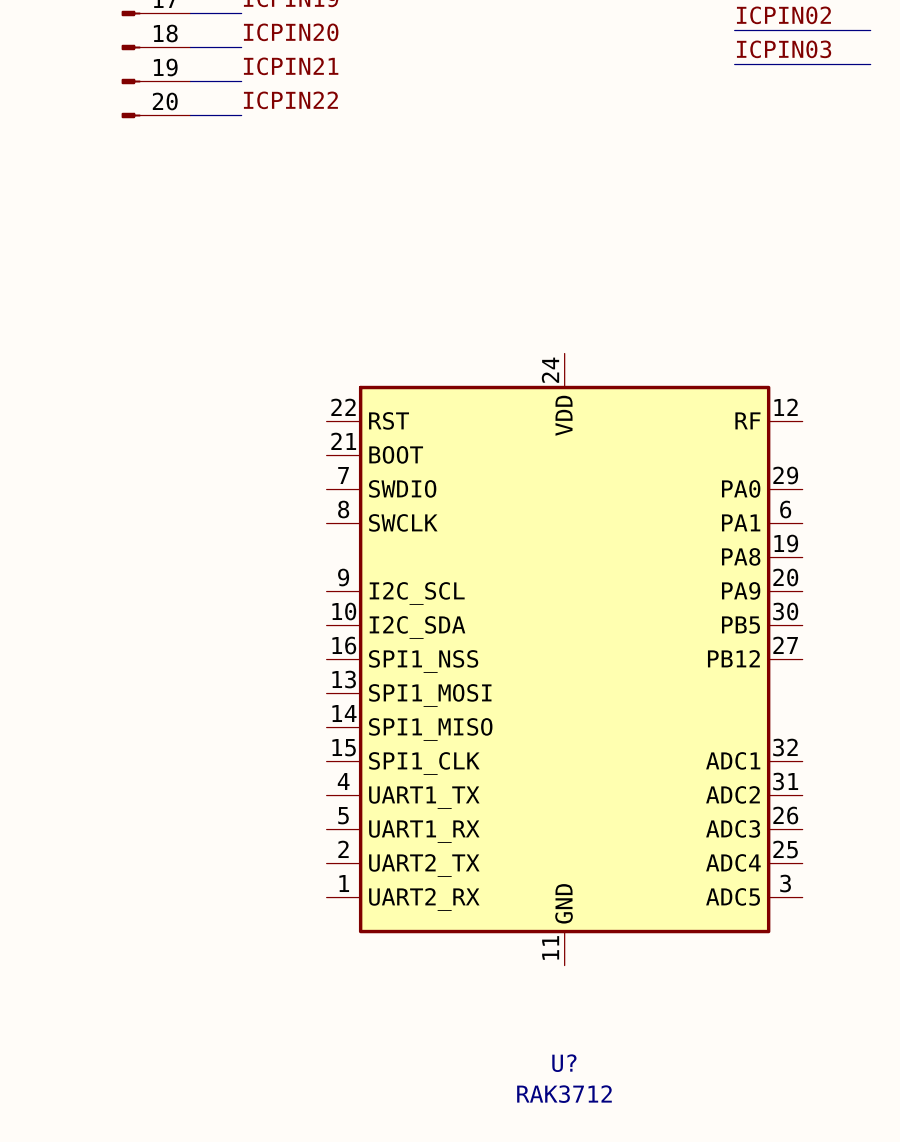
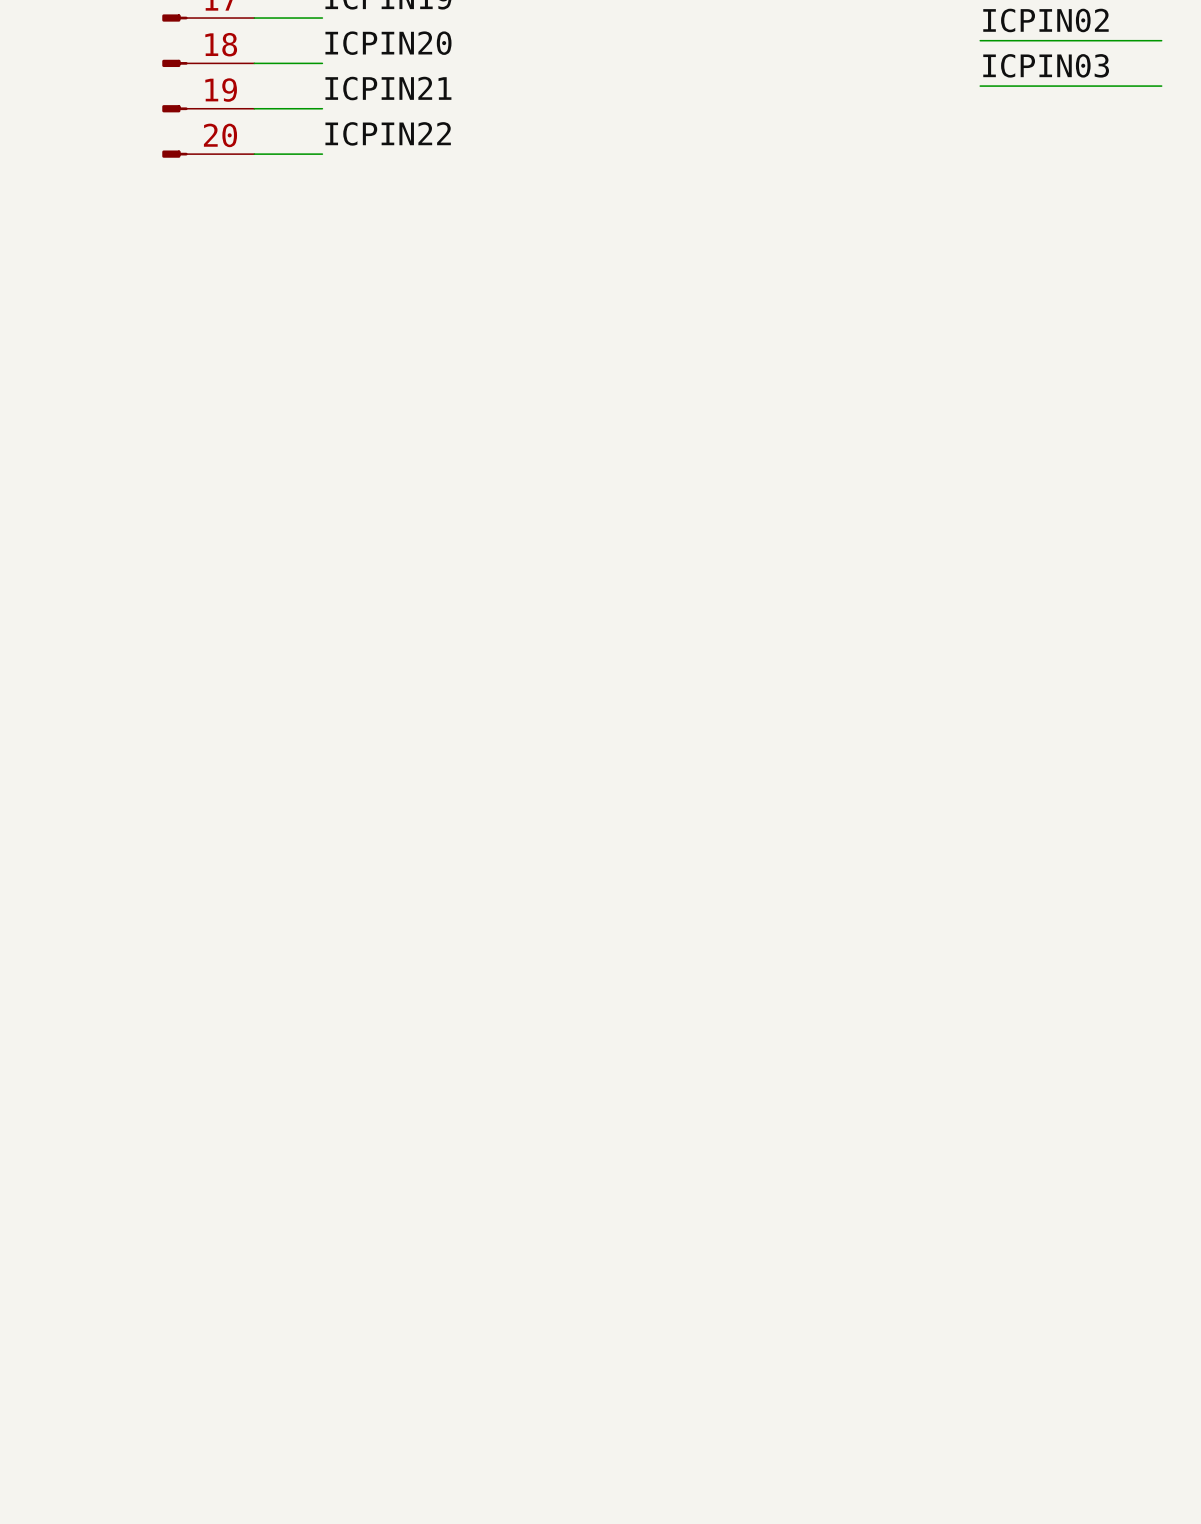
U?: RAK3712 (564, 659) -> none

